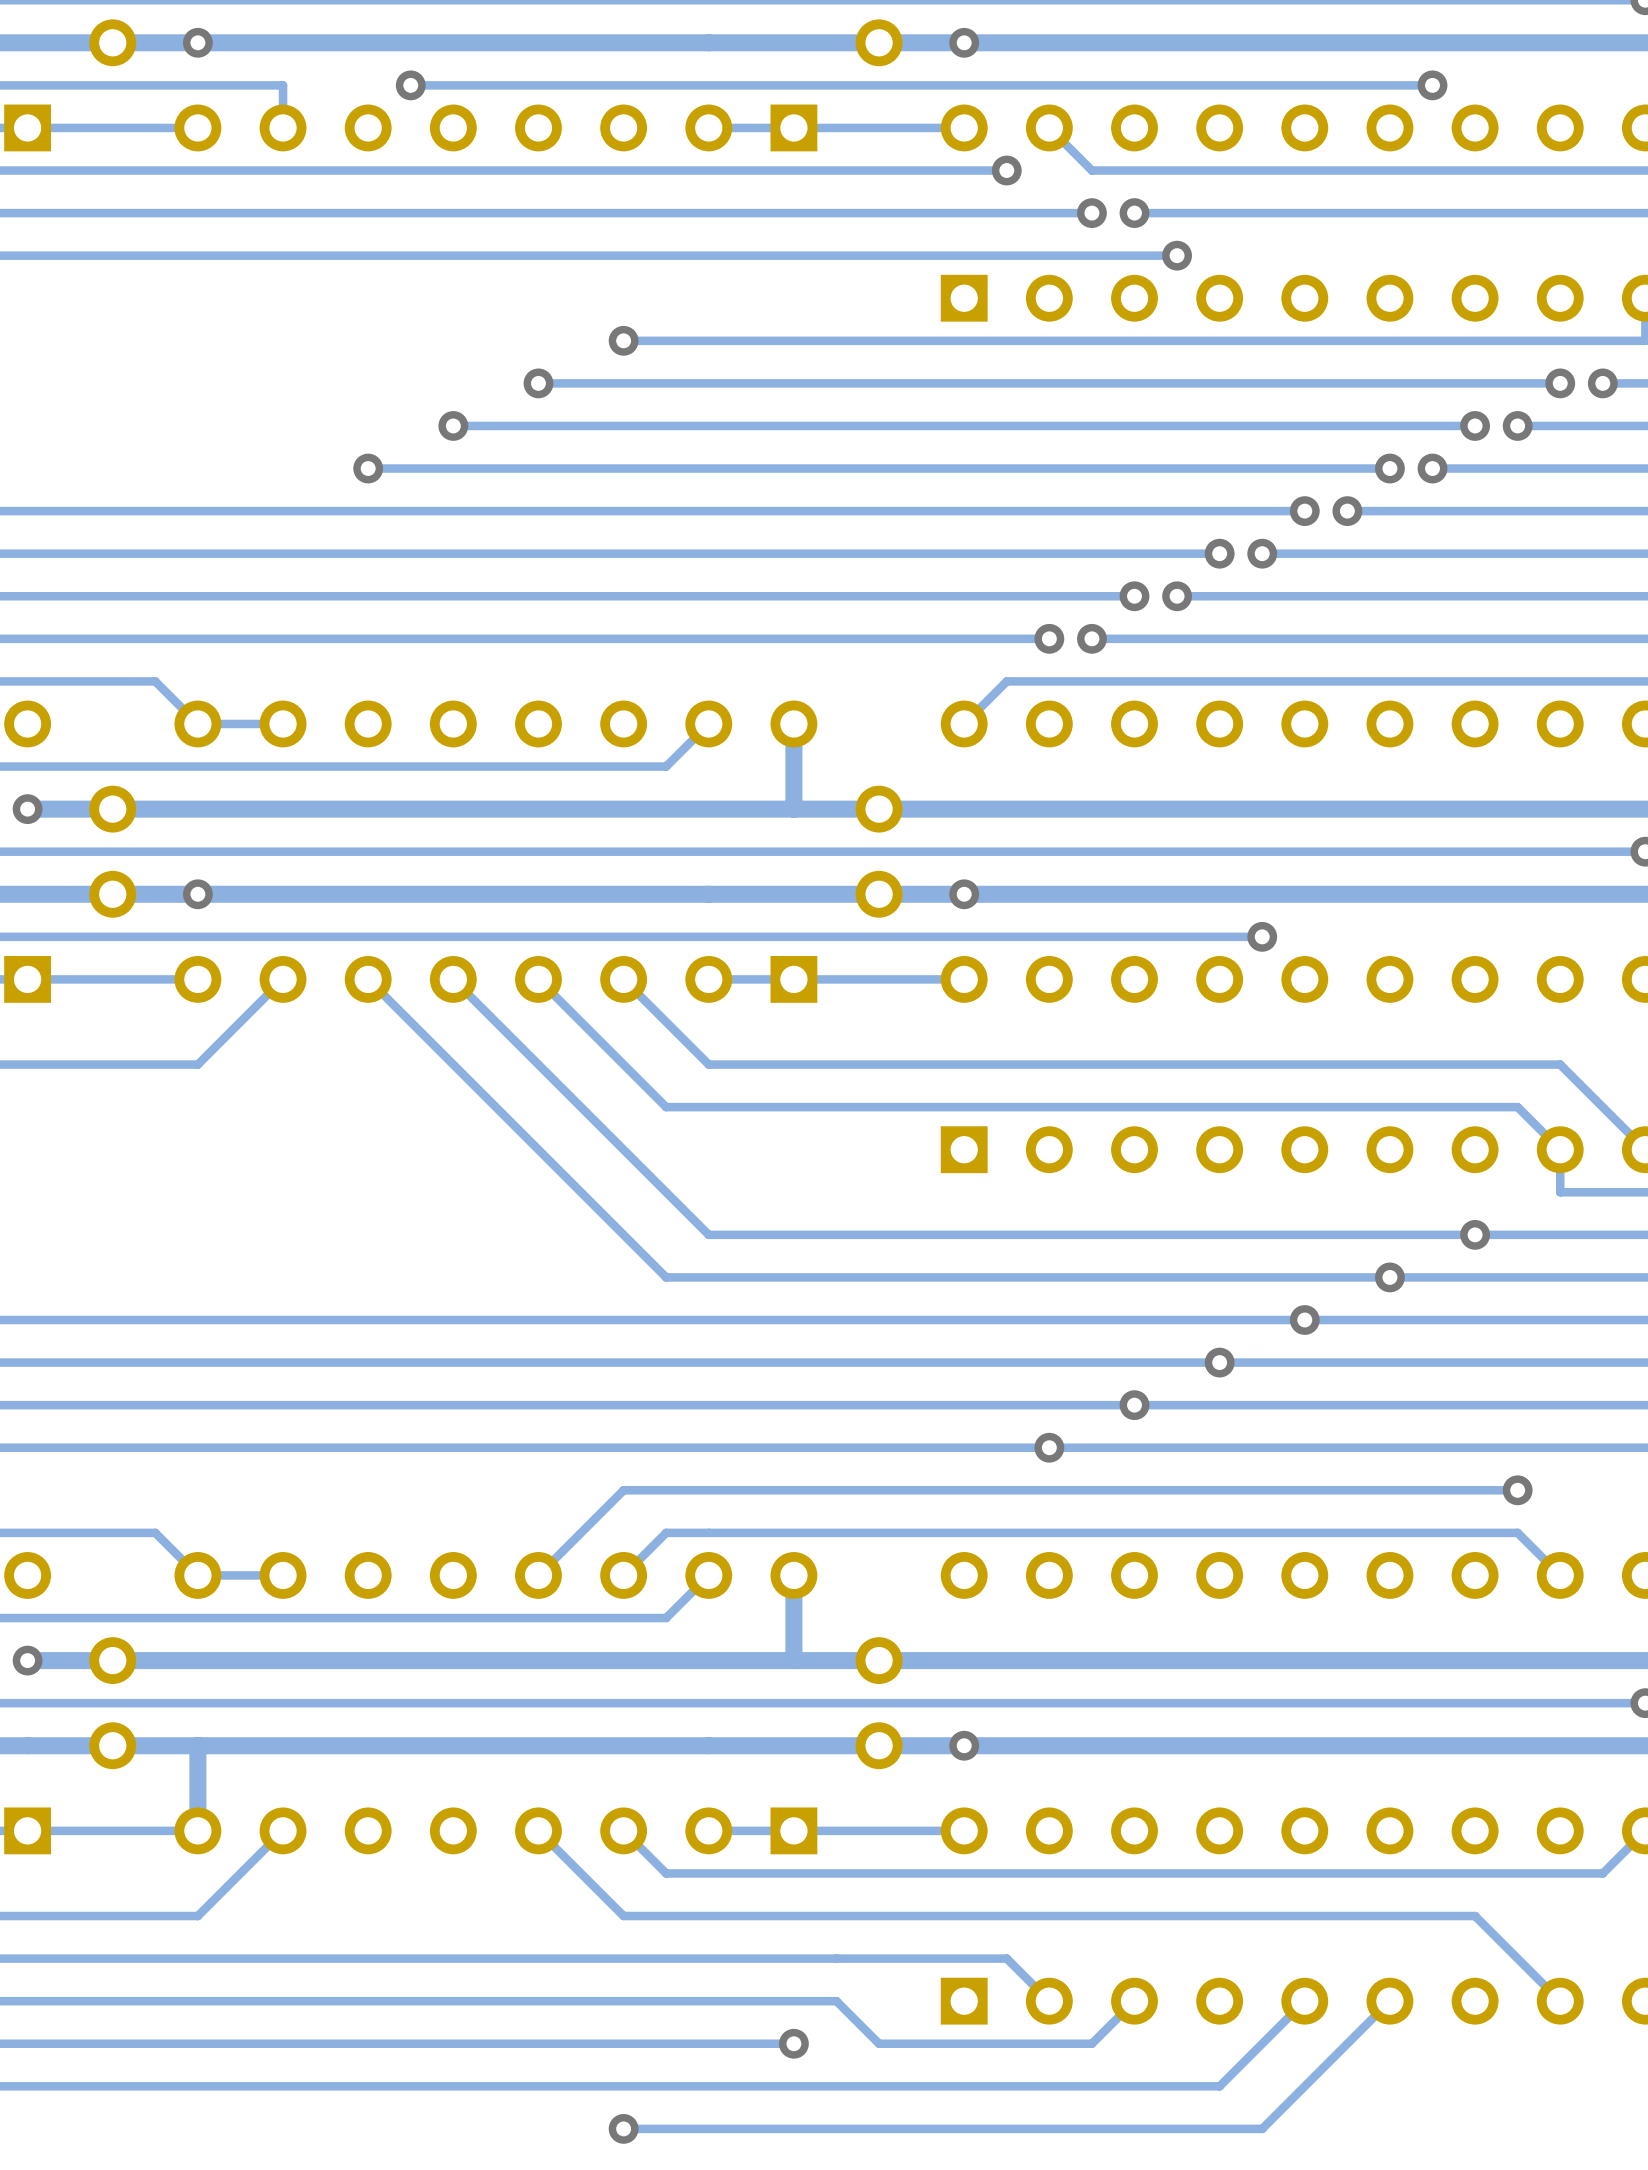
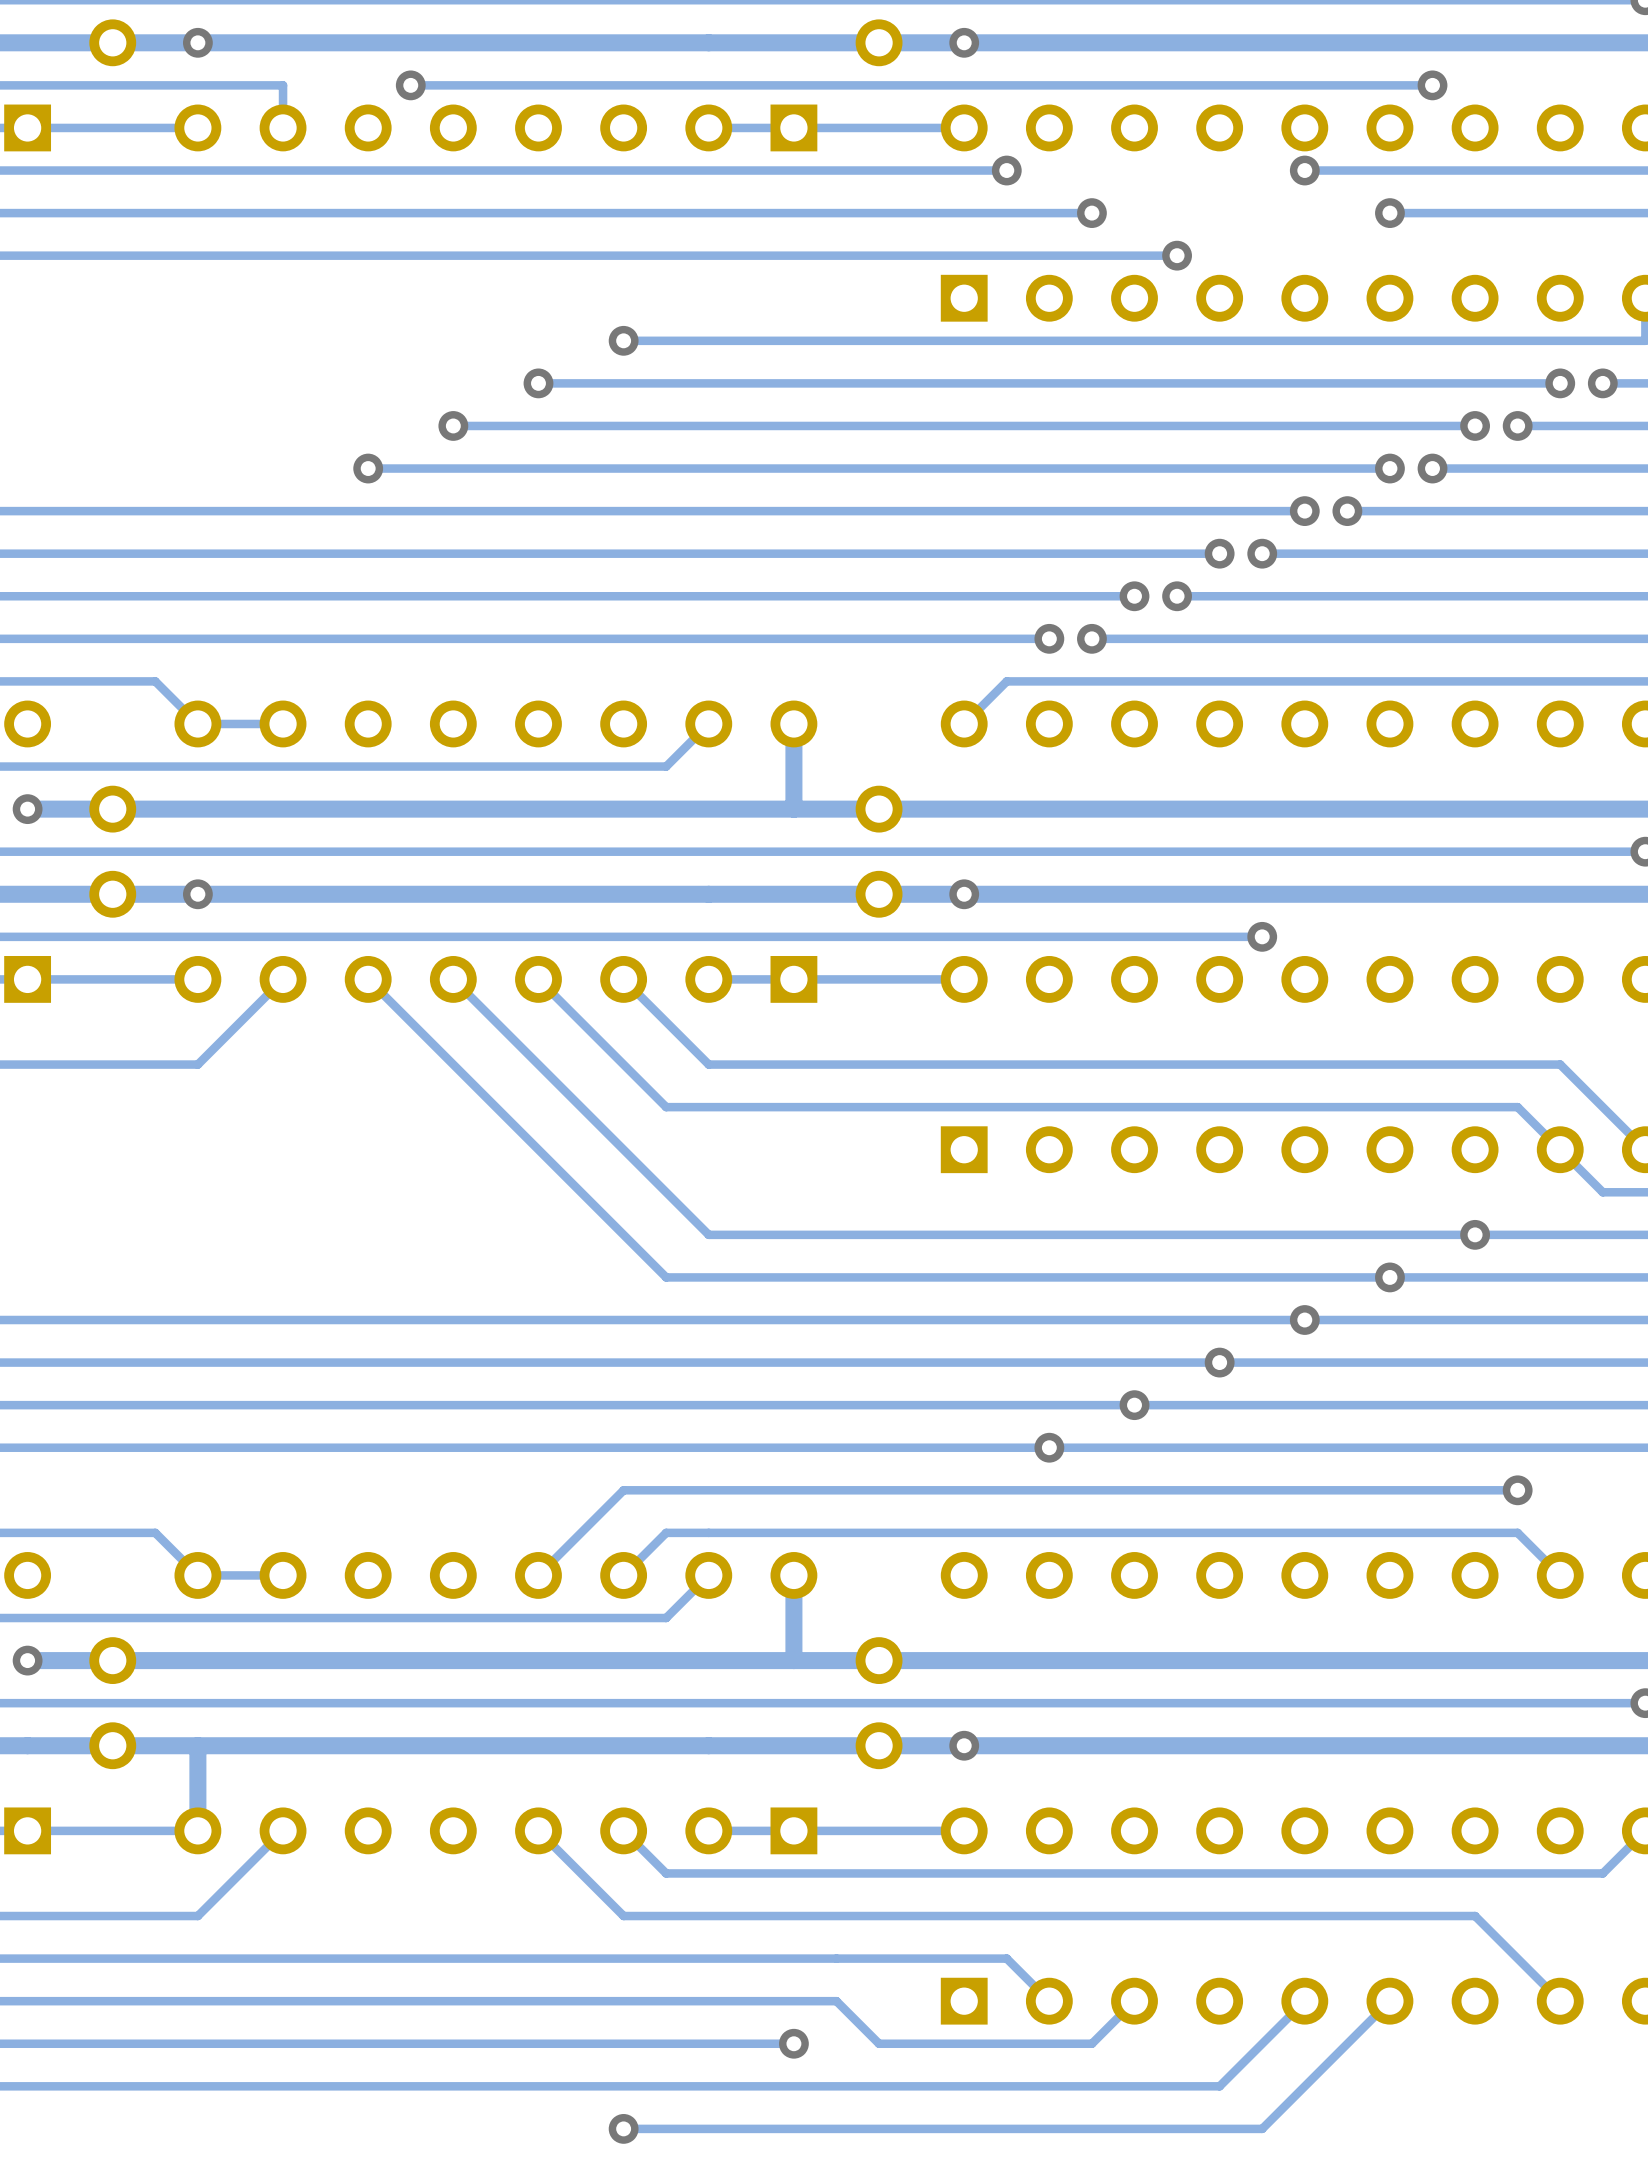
track: (1049, 127) (1091, 170) (1304, 170) -> none
via: none -> (1304, 170)
via: (1134, 213) -> none
track: (1389, 213) (1134, 213) -> none
via: none -> (1389, 213)
track: (1560, 1149) (1560, 1192) (1602, 1192) -> (1560, 1149) (1602, 1192)

